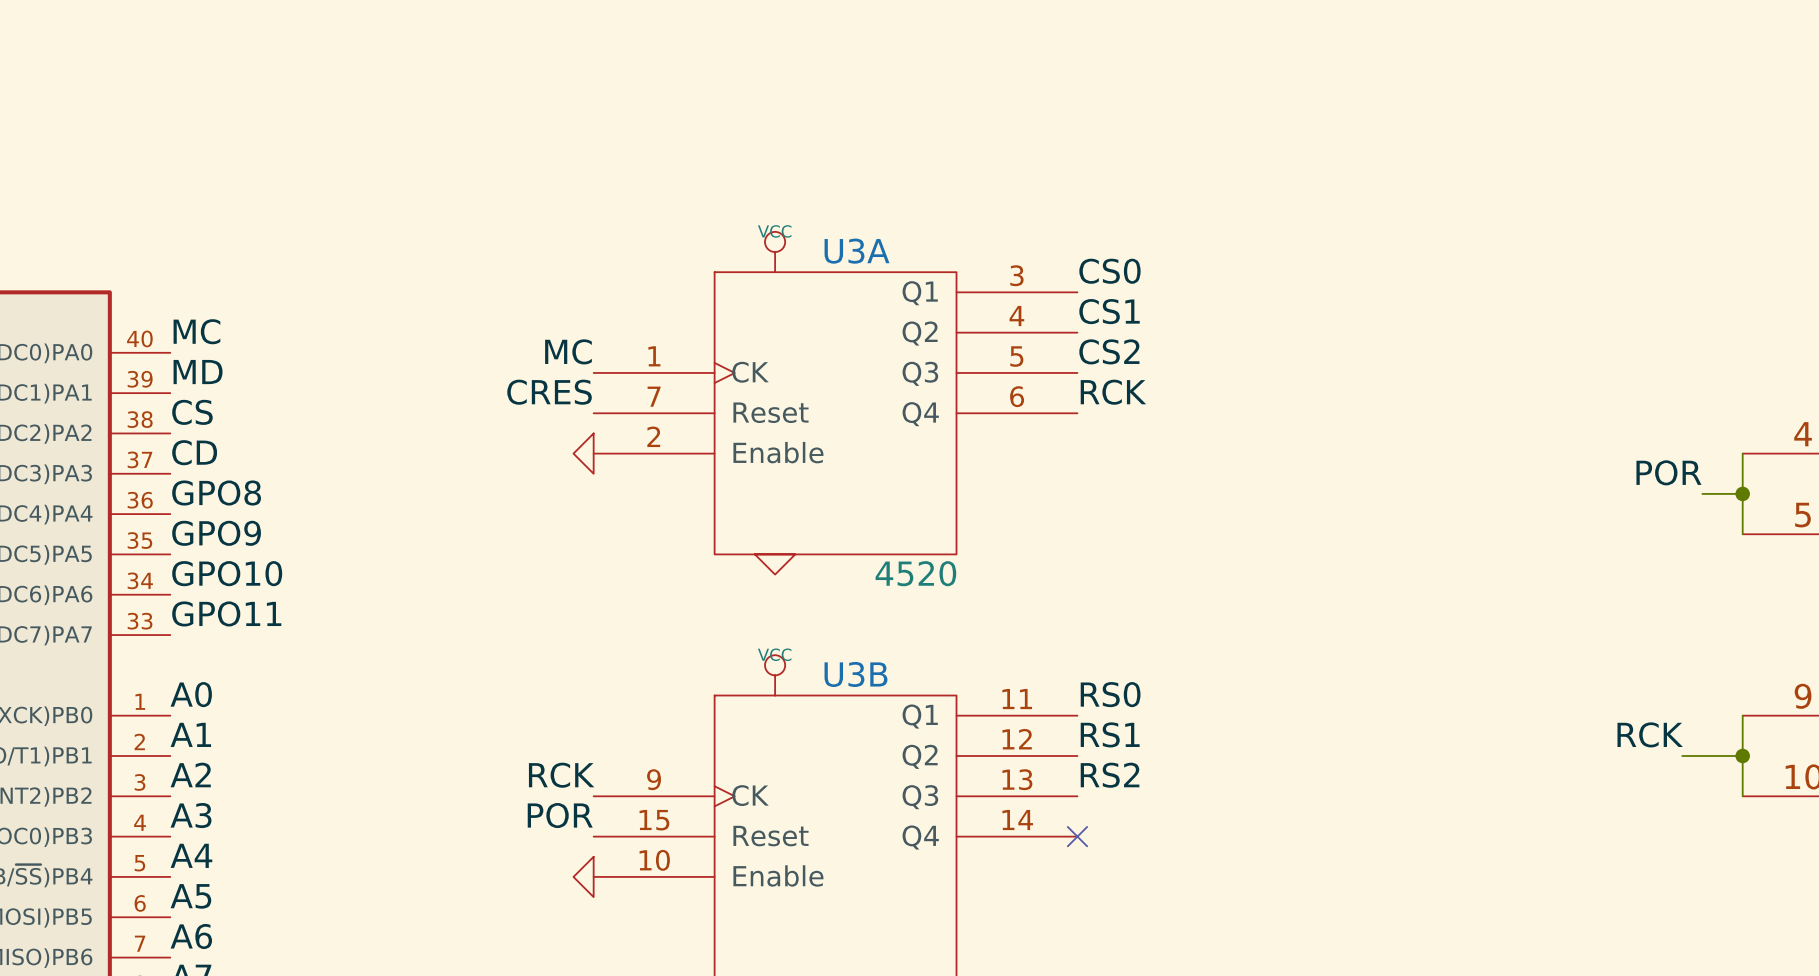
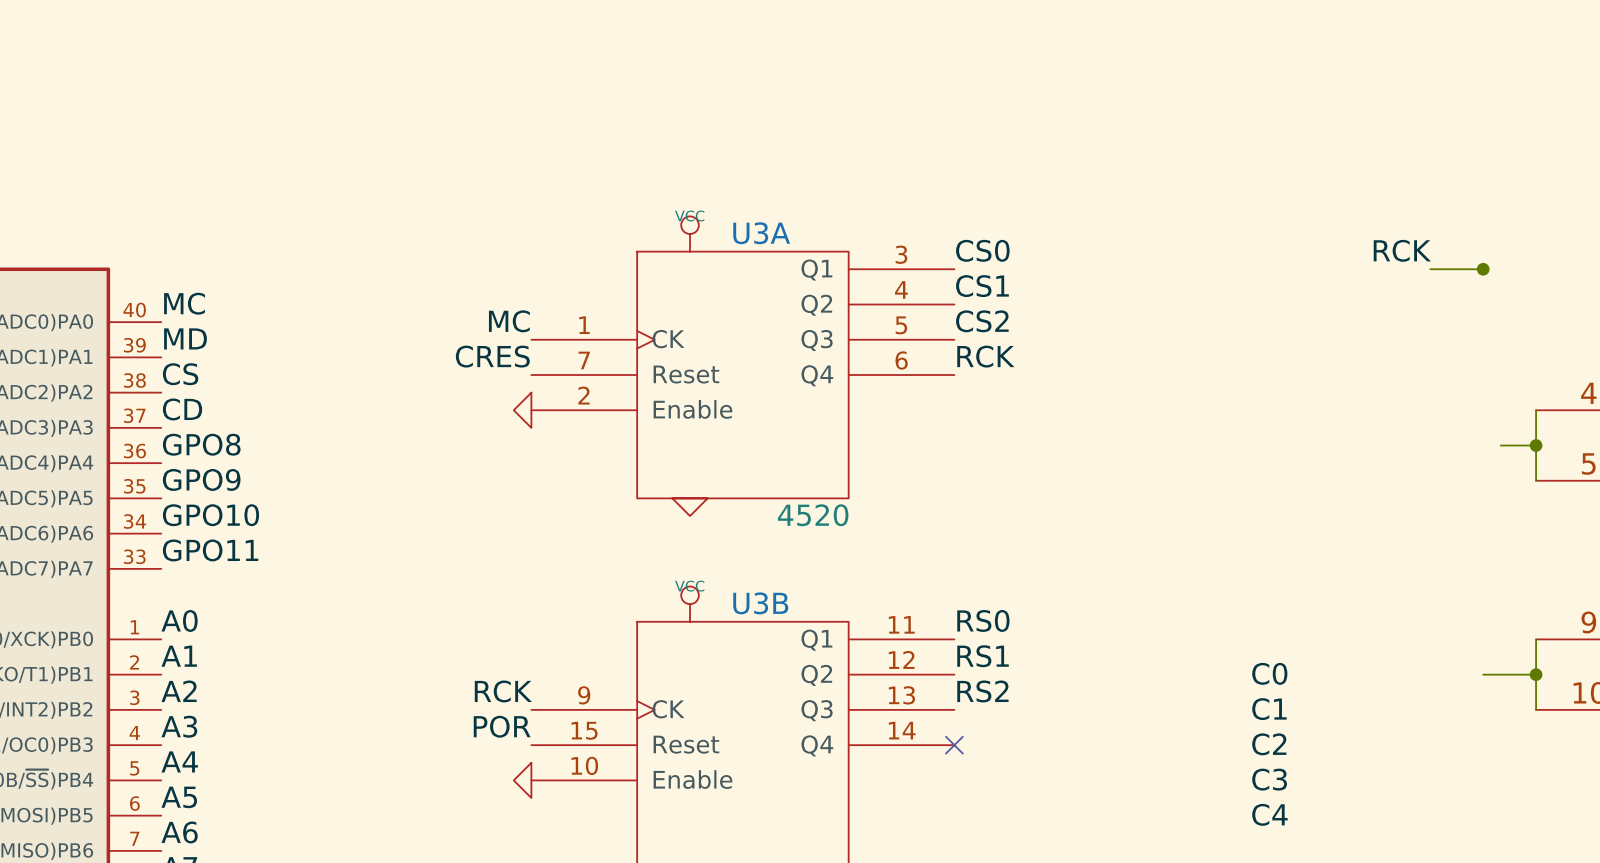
label: none -> RCK (1402, 250)
wire: none -> (1430, 269) (1483, 269)
junction: none -> (1483, 269)
label: POR (1668, 472) -> none
label: RCK (1650, 734) -> none
label: none -> C0 (1269, 673)
label: none -> C1 (1269, 709)
label: none -> C2 (1269, 744)
label: none -> C3 (1269, 779)
label: none -> C4 (1269, 814)

